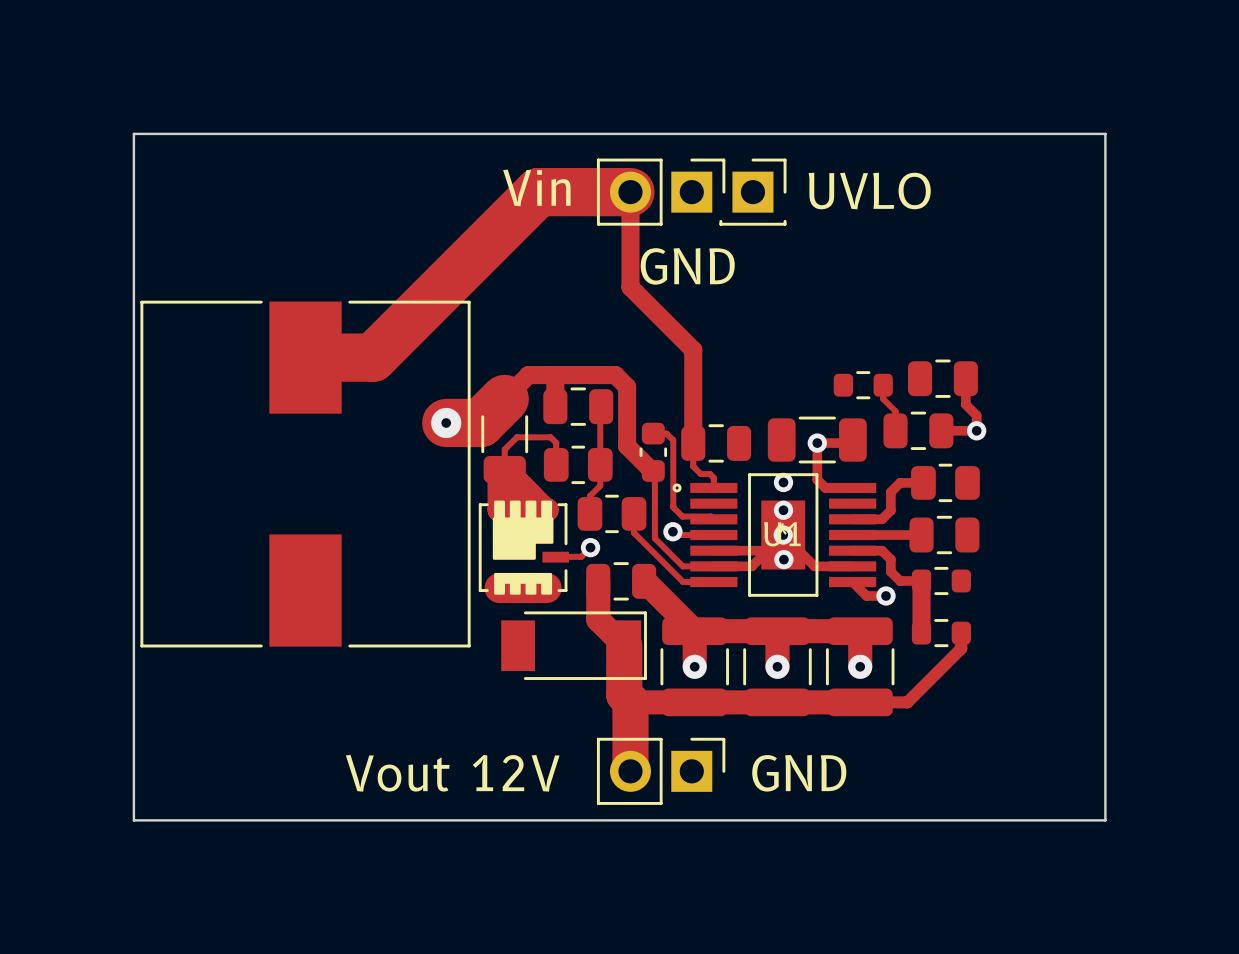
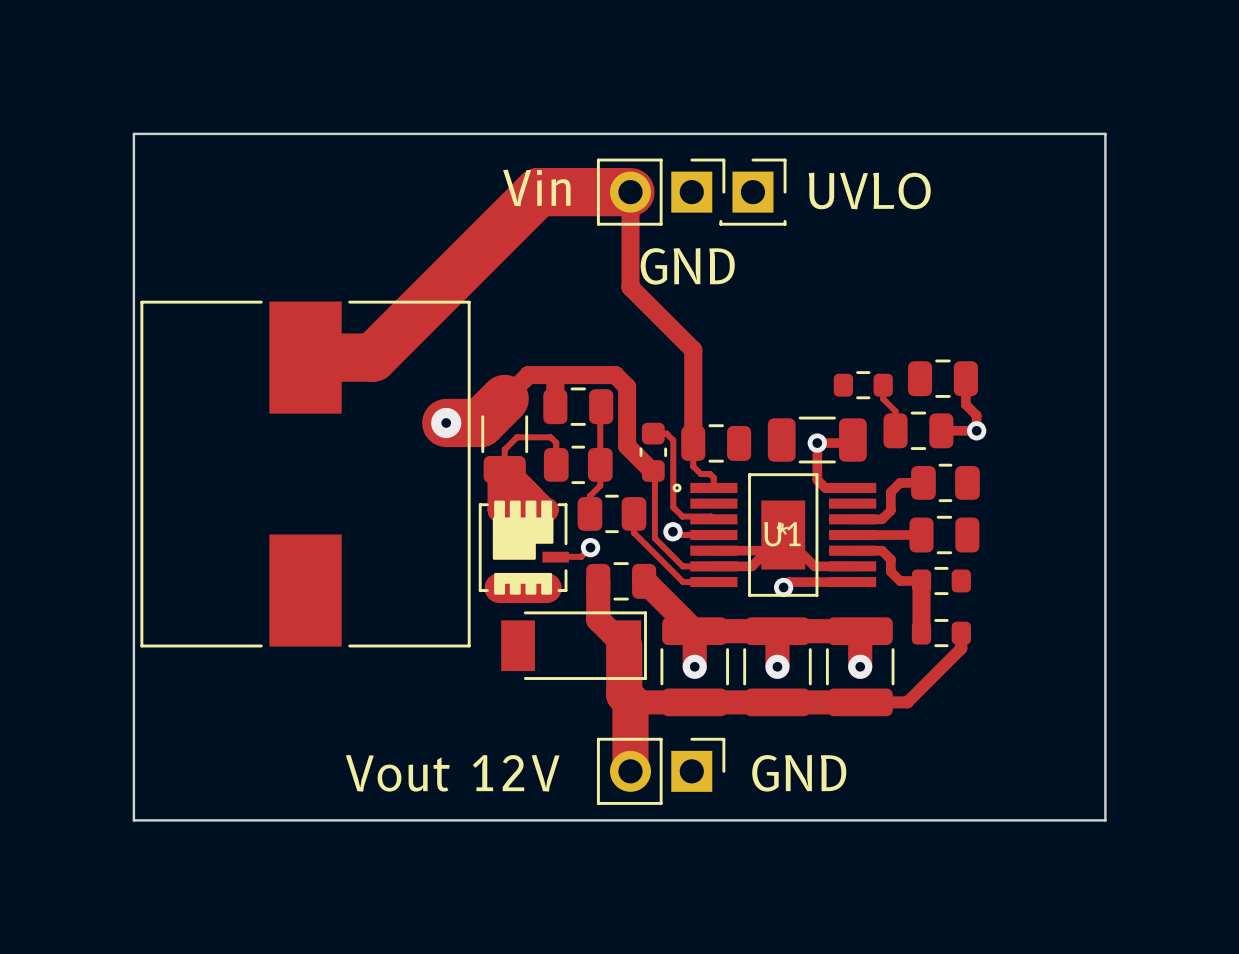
via: (783, 482) -> none
via: (783, 510) -> none
via: (783, 535) -> none
via: (783, 559) -> none
track: (852, 582) (866, 595) (886, 595) -> (852, 582) (789, 582) (783, 587)
via: none -> (783, 587)
via: (886, 595) -> none

